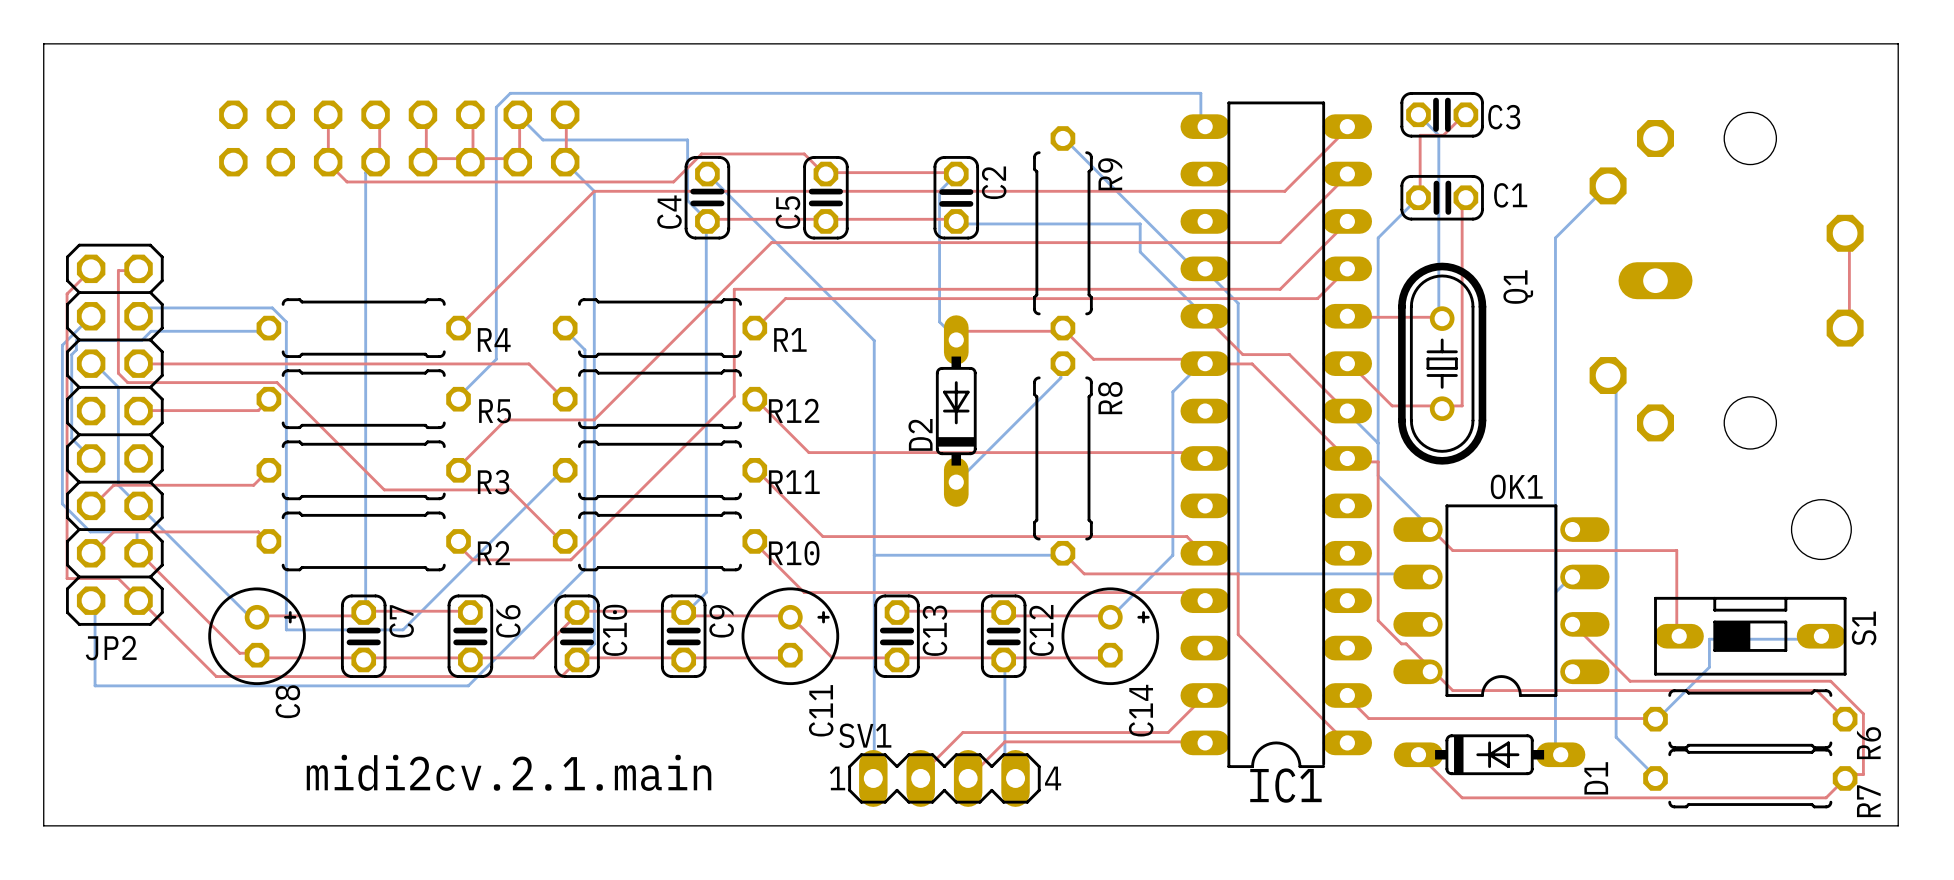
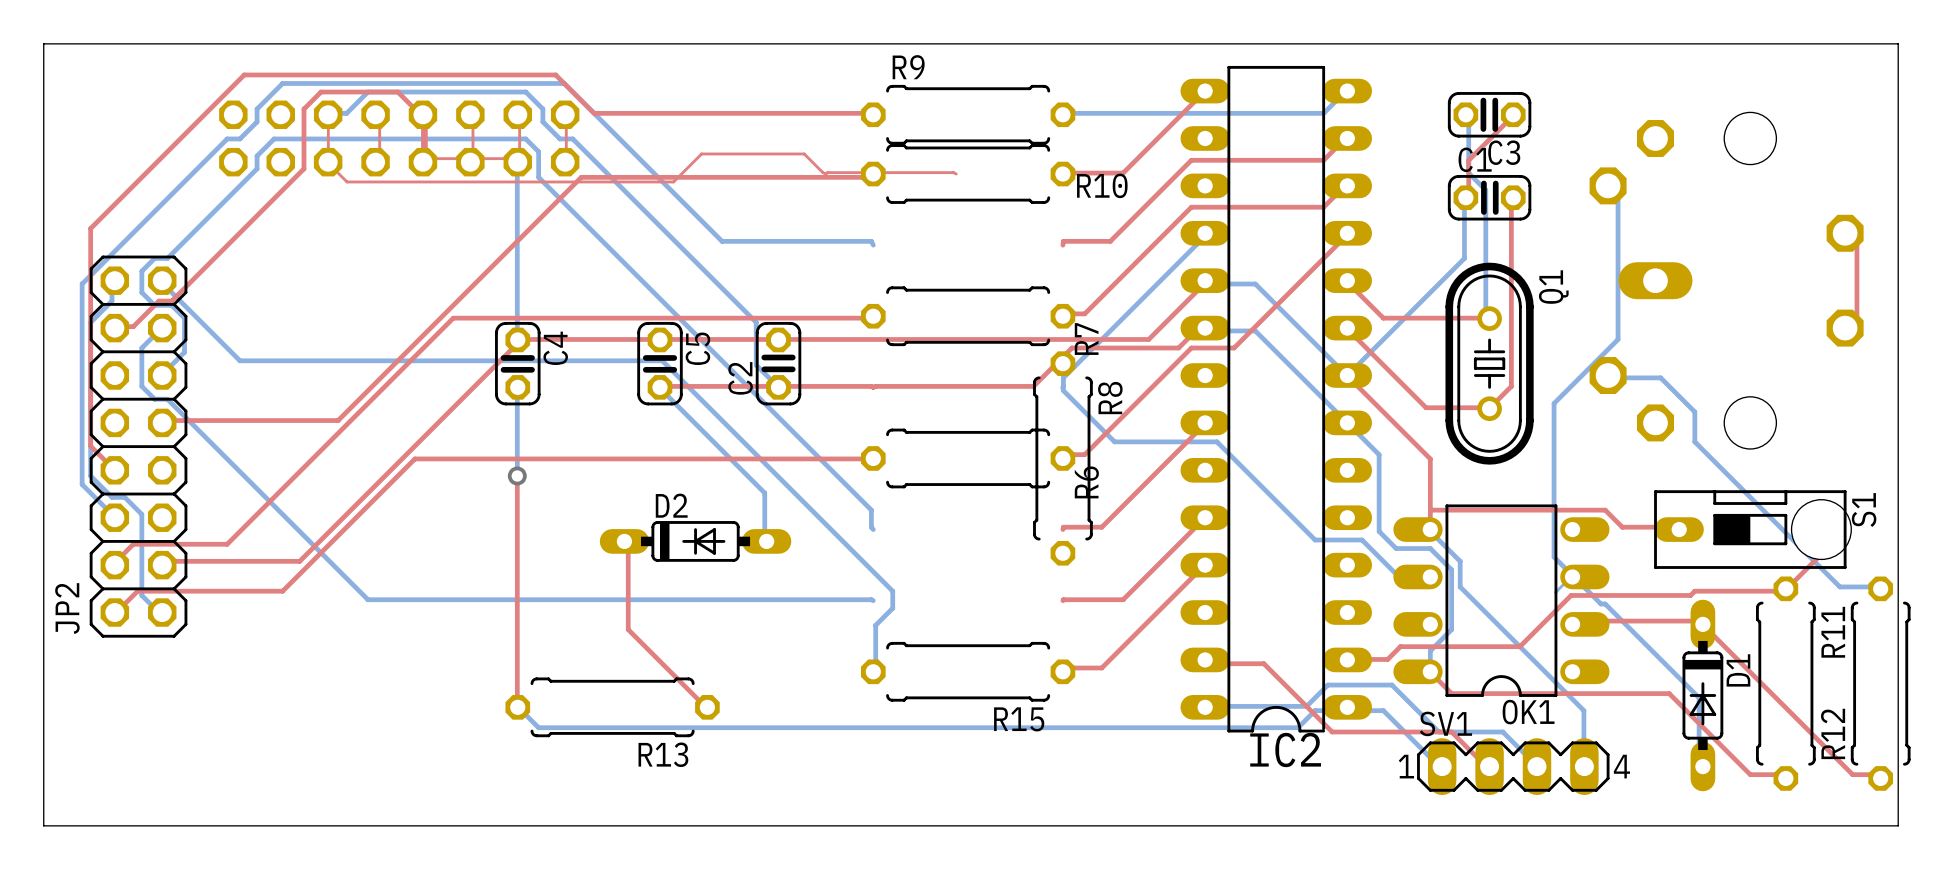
top track: none -> (1205, 91) (1123, 173) (1062, 174)
bottom track: none -> (1347, 91) (1323, 113) (1062, 114)
bottom track: none -> (328, 114) (346, 113) (367, 92) (525, 92) (542, 109) (542, 121) (559, 138) (572, 138) (756, 322) (756, 365) (778, 387)
bottom track: (517, 114) (542, 139) (687, 139) (687, 200) (707, 221) (706, 592) (687, 611) (683, 612) -> none
top track: none -> (873, 114) (594, 113) (555, 74) (244, 74) (90, 228) (90, 446) (114, 470)
bottom track: (1418, 114) (1438, 135) (1438, 317) (1442, 318) -> none
C3 position: (1442, 114) -> (1489, 114)
top track: (1465, 114) (1443, 135) (1420, 135) (1420, 195) (1418, 197) -> none
bottom track: none -> (1465, 114) (1468, 117) (1468, 173) (1485, 190) (1485, 318) (1489, 318)
C3 name position: C3 (1504, 117) -> C3 (1504, 152)
bottom track: (1205, 126) (1200, 125) (1200, 93) (510, 93) (496, 107) (496, 359) (458, 399) -> none
top track: (1347, 126) (1284, 191) (594, 191) (458, 328) -> none
bottom track: (1062, 138) (1191, 265) (1200, 265) (1205, 268) (1238, 303) (1238, 573) (1429, 573) (1430, 576) -> (1205, 233) (1204, 237) (1063, 377) (1063, 390) (1114, 441) (1217, 441) (1315, 540) (1362, 540) (1396, 574) (1430, 574) (1430, 576)
top track: none -> (1347, 138) (1323, 160) (1191, 160) (1110, 241) (1063, 241) (1062, 245)
top track: none -> (423, 160) (422, 114) (397, 92) (321, 92) (303, 109) (303, 168) (171, 301) (158, 301) (133, 326) (114, 328)
bottom track: (375, 162) (365, 172) (365, 611) (363, 612) -> none
bottom track: none -> (517, 162) (517, 339)
bottom track: (565, 162) (594, 191) (594, 643) (577, 659) -> none
bottom track: (707, 174) (874, 340) (873, 778) -> none
top track: none -> (873, 174) (871, 177) (581, 177) (338, 420) (163, 420) (162, 422)
bottom track: (956, 174) (939, 191) (939, 321) (956, 339) -> none
R9 name position: R9 (1110, 174) -> R9 (908, 67)
top track: (1347, 174) (1280, 242) (771, 242) (594, 419) (505, 419) (458, 466) (458, 470) -> none
top track: none -> (1347, 185) (1345, 185) (1323, 207) (1191, 207) (1084, 313) (1063, 313) (1062, 316)
bottom track: (1608, 185) (1555, 237) (1555, 746) (1560, 754) -> none
bottom track: none -> (1619, 185) (1618, 185) (1618, 339) (1554, 403) (1554, 557) (1600, 604) (1605, 604) (1699, 697) (1699, 766) (1702, 766)
C1 name position: C1 (1510, 195) -> C1 (1475, 159)
C4 rotation: 0° (707, 197) -> 180° (517, 363)
C4 position: (707, 197) -> (517, 363)
C5 rotation: 0° (825, 197) -> 180° (659, 363)
C5 position: (825, 197) -> (659, 363)
C2 rotation: 0° (956, 197) -> 180° (778, 363)
C2 position: (956, 197) -> (778, 363)
bottom track: (1418, 197) (1378, 237) (1378, 475) (1430, 529) -> (1584, 766) (1583, 710) (1460, 586) (1460, 561) (1430, 529)
C1 position: (1442, 197) -> (1489, 197)
top track: (1465, 197) (1462, 200) (1462, 405) (1443, 405) (1442, 408) (1438, 405) (1392, 405) (1350, 363) (1347, 363) -> (1465, 197) (1468, 194) (1468, 160) (1513, 114)
bottom track: none -> (1465, 197) (1464, 258) (1347, 375) (1255, 284) (1208, 284) (1205, 280)
top track: none -> (1513, 197) (1511, 198) (1511, 386) (1489, 408) (1426, 407) (1347, 328)
top track: (707, 221) (710, 219) (822, 219) (825, 221) (827, 219) (953, 219) (956, 221) -> none
bottom track: (956, 221) (958, 223) (1140, 223) (1140, 251) (1205, 316) -> none
top track: (1347, 221) (1280, 289) (734, 289) (734, 396) (570, 559) (472, 559) (458, 545) (458, 541) -> none
R9 rotation: 0° (1062, 233) -> 90° clockwise (968, 114)
R9 position: (1062, 233) -> (968, 114)
top track: none -> (1347, 233) (1234, 348) (1191, 348) (1084, 454) (1063, 454) (1062, 458)
top track: (1845, 233) (1849, 233) (1849, 326) (1845, 328) -> none
top track: none -> (1856, 233) (1856, 328)
bottom track: none -> (873, 245) (871, 241) (722, 241) (564, 83) (282, 83) (257, 109) (257, 121) (239, 138) (227, 138) (82, 284) (82, 484) (114, 517)
top track: (91, 268) (67, 293) (67, 578) (118, 578) (216, 676) (561, 676) (580, 657) (682, 657) (683, 659) (687, 657) (790, 657) (790, 655) -> none
top track: (138, 268) (137, 270) (118, 270) (118, 373) (127, 382) (277, 382) (384, 489) (510, 489) (561, 541) (565, 541) -> none
top track: (1347, 268) (1317, 298) (785, 298) (754, 328) -> none
bottom track: none -> (114, 280) (111, 284) (111, 301) (90, 322) (90, 476) (111, 497) (124, 497) (141, 514) (141, 595) (158, 612) (162, 612)
bottom track: none -> (162, 280) (163, 284) (239, 360) (662, 360) (892, 591) (892, 608) (875, 625) (875, 668) (873, 671)
top track: none -> (1205, 280) (1204, 284) (1148, 339) (517, 339) (517, 343) (299, 561) (163, 561) (162, 565)
top track: none -> (1347, 280) (1383, 318) (1489, 318)
Q1 name position: Q1 (1518, 287) -> Q1 (1553, 287)
bottom track: (91, 316) (62, 345) (62, 503) (90, 531) (137, 531) (138, 553) -> none
bottom track: (138, 316) (141, 312) (141, 307) (272, 307) (286, 321) (286, 629) (403, 629) (561, 471) (565, 470) -> none
top track: none -> (873, 316) (871, 318) (453, 318) (227, 544) (133, 544) (114, 565)
top track: (1205, 316) (1242, 354) (1289, 354) (1347, 411) -> none
top track: (1347, 316) (1442, 318) -> none
bottom track: none -> (162, 328) (141, 348) (141, 386) (154, 399) (167, 399) (367, 599) (873, 600)
bottom track: (268, 328) (267, 331) (151, 331) (141, 340) (76, 340) (76, 349) (71, 354) (71, 438) (91, 458) -> none
R4: (363, 328) -> none
bottom track: (565, 328) (584, 349) (584, 569) (468, 685) (95, 685) (95, 601) (91, 600) -> none
R1: (659, 328) -> none
top track: none -> (1205, 328) (1204, 330) (1195, 330) (1178, 348) (1071, 348) (1033, 386) (659, 387)
bottom track: none -> (1205, 328) (1208, 330) (1255, 330) (1379, 454) (1379, 531) (1396, 548) (1430, 548) (1451, 569) (1451, 629) (1430, 650) (1430, 671)
top track: (956, 339) (962, 331) (1060, 331) (1062, 328) (1093, 359) (1200, 359) (1205, 363) (1252, 363) (1350, 461) (1378, 461) (1378, 620) (1401, 643) (1406, 643) (1429, 667) (1430, 671) (1434, 671) (1452, 690) (1816, 690) (1845, 719) -> none
bottom track: (91, 363) (95, 363) (118, 387) (118, 485) (253, 620) (257, 617) -> none
top track: (138, 363) (528, 363) (565, 399) -> none
bottom track: (1062, 363) (1060, 363) (1060, 377) (956, 482) -> none
bottom track: (1205, 363) (1200, 363) (1172, 391) (1172, 555) (1110, 617) -> none
Q1 position: (1442, 363) -> (1489, 363)
bottom track: none -> (162, 375) (184, 352) (184, 318) (171, 305) (154, 305) (141, 292) (141, 271) (154, 258) (167, 258) (257, 168) (257, 156) (274, 138) (525, 138) (538, 151) (538, 177) (871, 510) (871, 527) (873, 529)
bottom track: (1608, 375) (1616, 382) (1616, 737) (1655, 778) -> none
bottom track: none -> (1619, 375) (1622, 377) (1660, 377) (1694, 412) (1694, 441) (1839, 586) (1878, 586) (1880, 588)
bottom track: none -> (517, 387) (517, 476)
bottom track: none -> (659, 387) (764, 493) (764, 540) (766, 541)
top track: (268, 399) (258, 410) (138, 411) -> none
R5: (363, 399) -> none
R12 rotation: 0° (659, 399) -> 90° clockwise (1880, 683)
R12 position: (659, 399) -> (1880, 683)
top track: (754, 399) (808, 452) (1196, 452) (1205, 458) -> none
IC2: none -> (1276, 399)
R12 name position: R12 (794, 410) -> R12 (1833, 733)
D2 rotation: 0° (956, 411) -> 90° clockwise (695, 541)
D2 position: (956, 411) -> (695, 541)
bottom track: (1347, 411) (1378, 443) -> none
top track: none -> (1205, 422) (1101, 527) (1063, 527) (1062, 529)
JP2 position: (114, 434) -> (138, 446)
IC1: (1276, 434) -> none
top track: none -> (873, 458) (414, 458) (282, 591) (137, 591) (114, 612)
top track: (268, 470) (253, 485) (113, 485) (91, 505) -> none
R3: (363, 470) -> none
R11 rotation: 0° (659, 470) -> 90° clockwise (1785, 683)
R11 position: (659, 470) -> (1785, 683)
top track: (754, 470) (822, 536) (1186, 536) (1205, 553) -> none
top track: none -> (517, 476) (517, 707)
via: none -> (517, 476)
R11 name position: R11 (794, 482) -> R11 (1833, 632)
OK1 name position: OK1 (1516, 486) -> OK1 (1528, 712)
top track: none -> (1430, 510) (1605, 510) (1622, 527) (1677, 527) (1679, 529)
top track: none -> (1205, 517) (1123, 599) (1062, 600)
top track: (1430, 529) (1452, 550) (1676, 550) (1676, 634) (1679, 636) -> (1430, 529) (1430, 458) (1347, 375)
top track: none -> (1821, 529) (1818, 531) (1818, 557) (1784, 591) (1694, 591) (1690, 595) (1571, 595) (1519, 646) (1400, 646) (1387, 659) (1347, 659)
top track: (268, 541) (258, 531) (113, 531) (91, 553) -> none
R2: (363, 541) -> none
top track: none -> (624, 541) (628, 544) (628, 629) (707, 707)
R10 position: (659, 541) -> (968, 174)
top track: (754, 541) (804, 592) (1196, 592) (1205, 600) -> none
top track: (138, 553) (239, 653) (253, 653) (258, 657) (361, 657) (363, 659) (365, 657) (468, 657) (470, 659) (472, 657) (533, 657) (580, 611) (682, 611) (687, 615) (790, 615) (832, 657) (892, 657) (897, 659) (897, 657) (1000, 657) (1003, 659) (1004, 657) (1107, 657) (1110, 655) -> none
top track: (1062, 553) (1084, 573) (1238, 573) (1238, 634) (1347, 742) -> none
bottom track: (1062, 553) (1060, 555) (874, 555) -> none
top track: none -> (1205, 565) (1101, 668) (1063, 668) (1062, 671)
top track: (470, 612) (365, 611) (361, 615) (257, 617) -> none
top track: (897, 612) (1000, 611) (1003, 612) (1004, 615) (1110, 617) -> none
top track: (1572, 624) (1630, 681) (1830, 681) (1863, 713) (1863, 774) (1849, 774) (1826, 797) (1462, 797) (1418, 754) -> (1572, 624) (1575, 621) (1699, 621) (1852, 774) (1878, 774) (1880, 778)
S1 name position: S1 (1864, 628) -> S1 (1864, 510)
C8: (257, 636) -> none
C7: (363, 636) -> none
C6: (470, 636) -> none
C10: (577, 636) -> none
C9: (683, 636) -> none
C11: (790, 636) -> none
C13: (897, 636) -> none
C12: (1003, 636) -> none
C14: (1110, 636) -> none
S1 position: (1750, 636) -> (1750, 529)
bottom track: (1821, 636) (1821, 639) (1709, 639) (1709, 667) (1655, 719) -> none
JP2 name rotation: 0° (111, 648) -> 90° counterclockwise (67, 608)
bottom track: (1003, 659) (1004, 765) (1015, 778) -> none
top track: none -> (1205, 659) (1208, 663) (1263, 663) (1332, 731) (1451, 731) (1485, 766) (1489, 766)
R15: none -> (968, 671)
top track: none -> (1430, 671) (1451, 693) (1669, 693) (1750, 774) (1784, 774) (1785, 778)
top track: (1205, 695) (1168, 732) (962, 732) (920, 774) (920, 778) -> none
top track: (1347, 695) (1368, 718) (1655, 719) -> none
bottom track: none -> (517, 707) (538, 727) (1298, 727) (1315, 710) (1345, 710) (1347, 707) (1349, 710) (1383, 710) (1438, 766) (1442, 766)
R13: none -> (612, 707)
bottom track: none -> (1205, 707) (1306, 706) (1327, 685) (1391, 685) (1438, 731) (1502, 731) (1536, 766)
R6 position: (1750, 719) -> (968, 458)
SV1 name position: SV1 (865, 735) -> SV1 (1445, 723)
top track: (1205, 742) (1004, 741) (968, 778) -> none
D1 rotation: 0° (1489, 754) -> 90° clockwise (1702, 695)
D1 position: (1489, 754) -> (1702, 695)
text: midi2cv.2.1.main (509, 772) -> none
SV1 position: (944, 778) -> (1513, 766)
D1 name position: D1 (1596, 778) -> D1 (1738, 670)
R7 position: (1750, 778) -> (968, 316)

